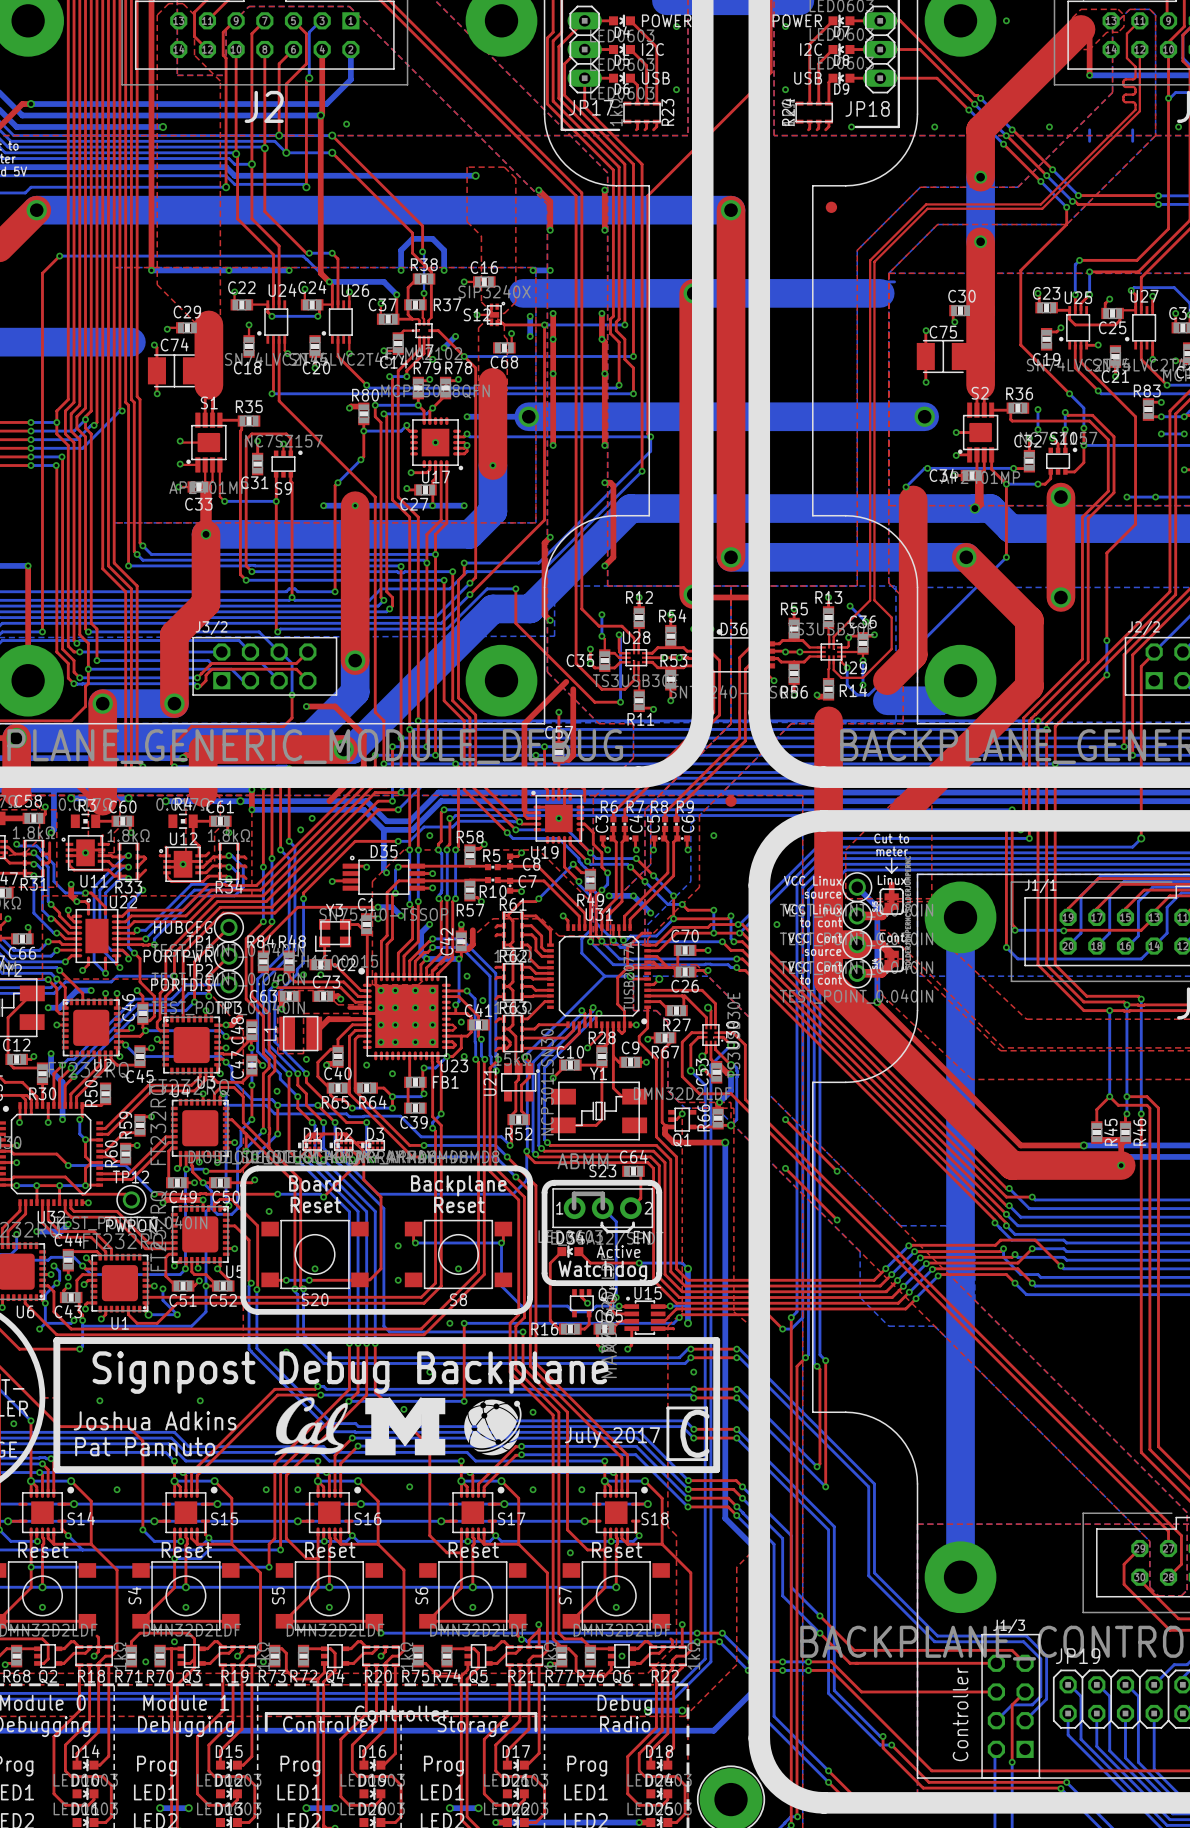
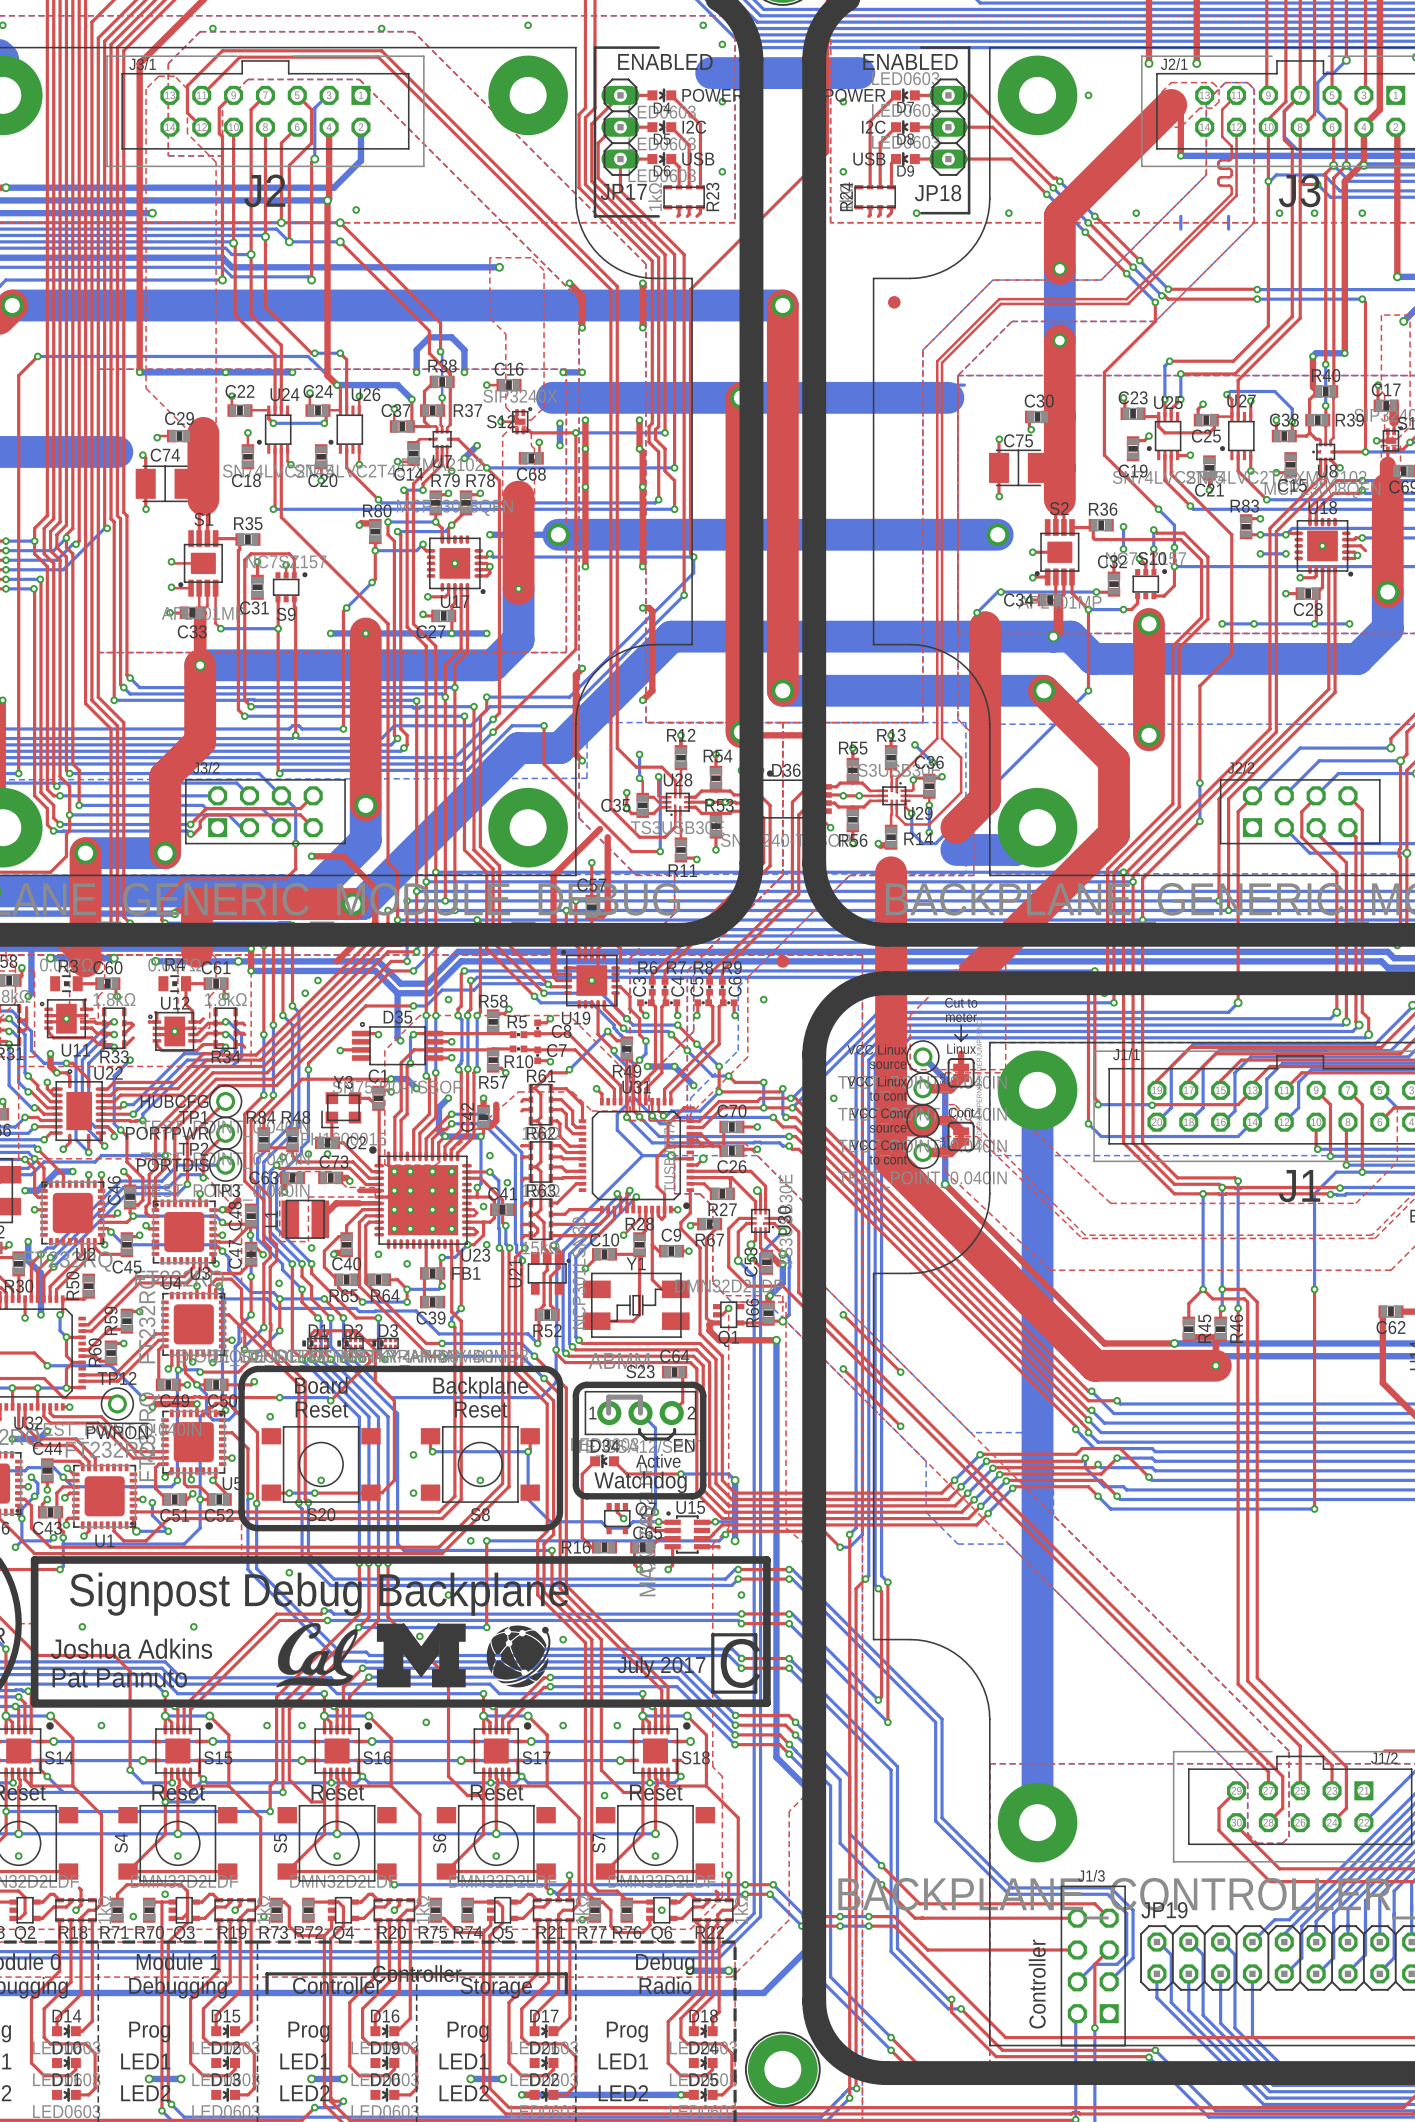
top track: (589, 1313) (589, 1324) (584, 1329) (577, 1329) -> none

